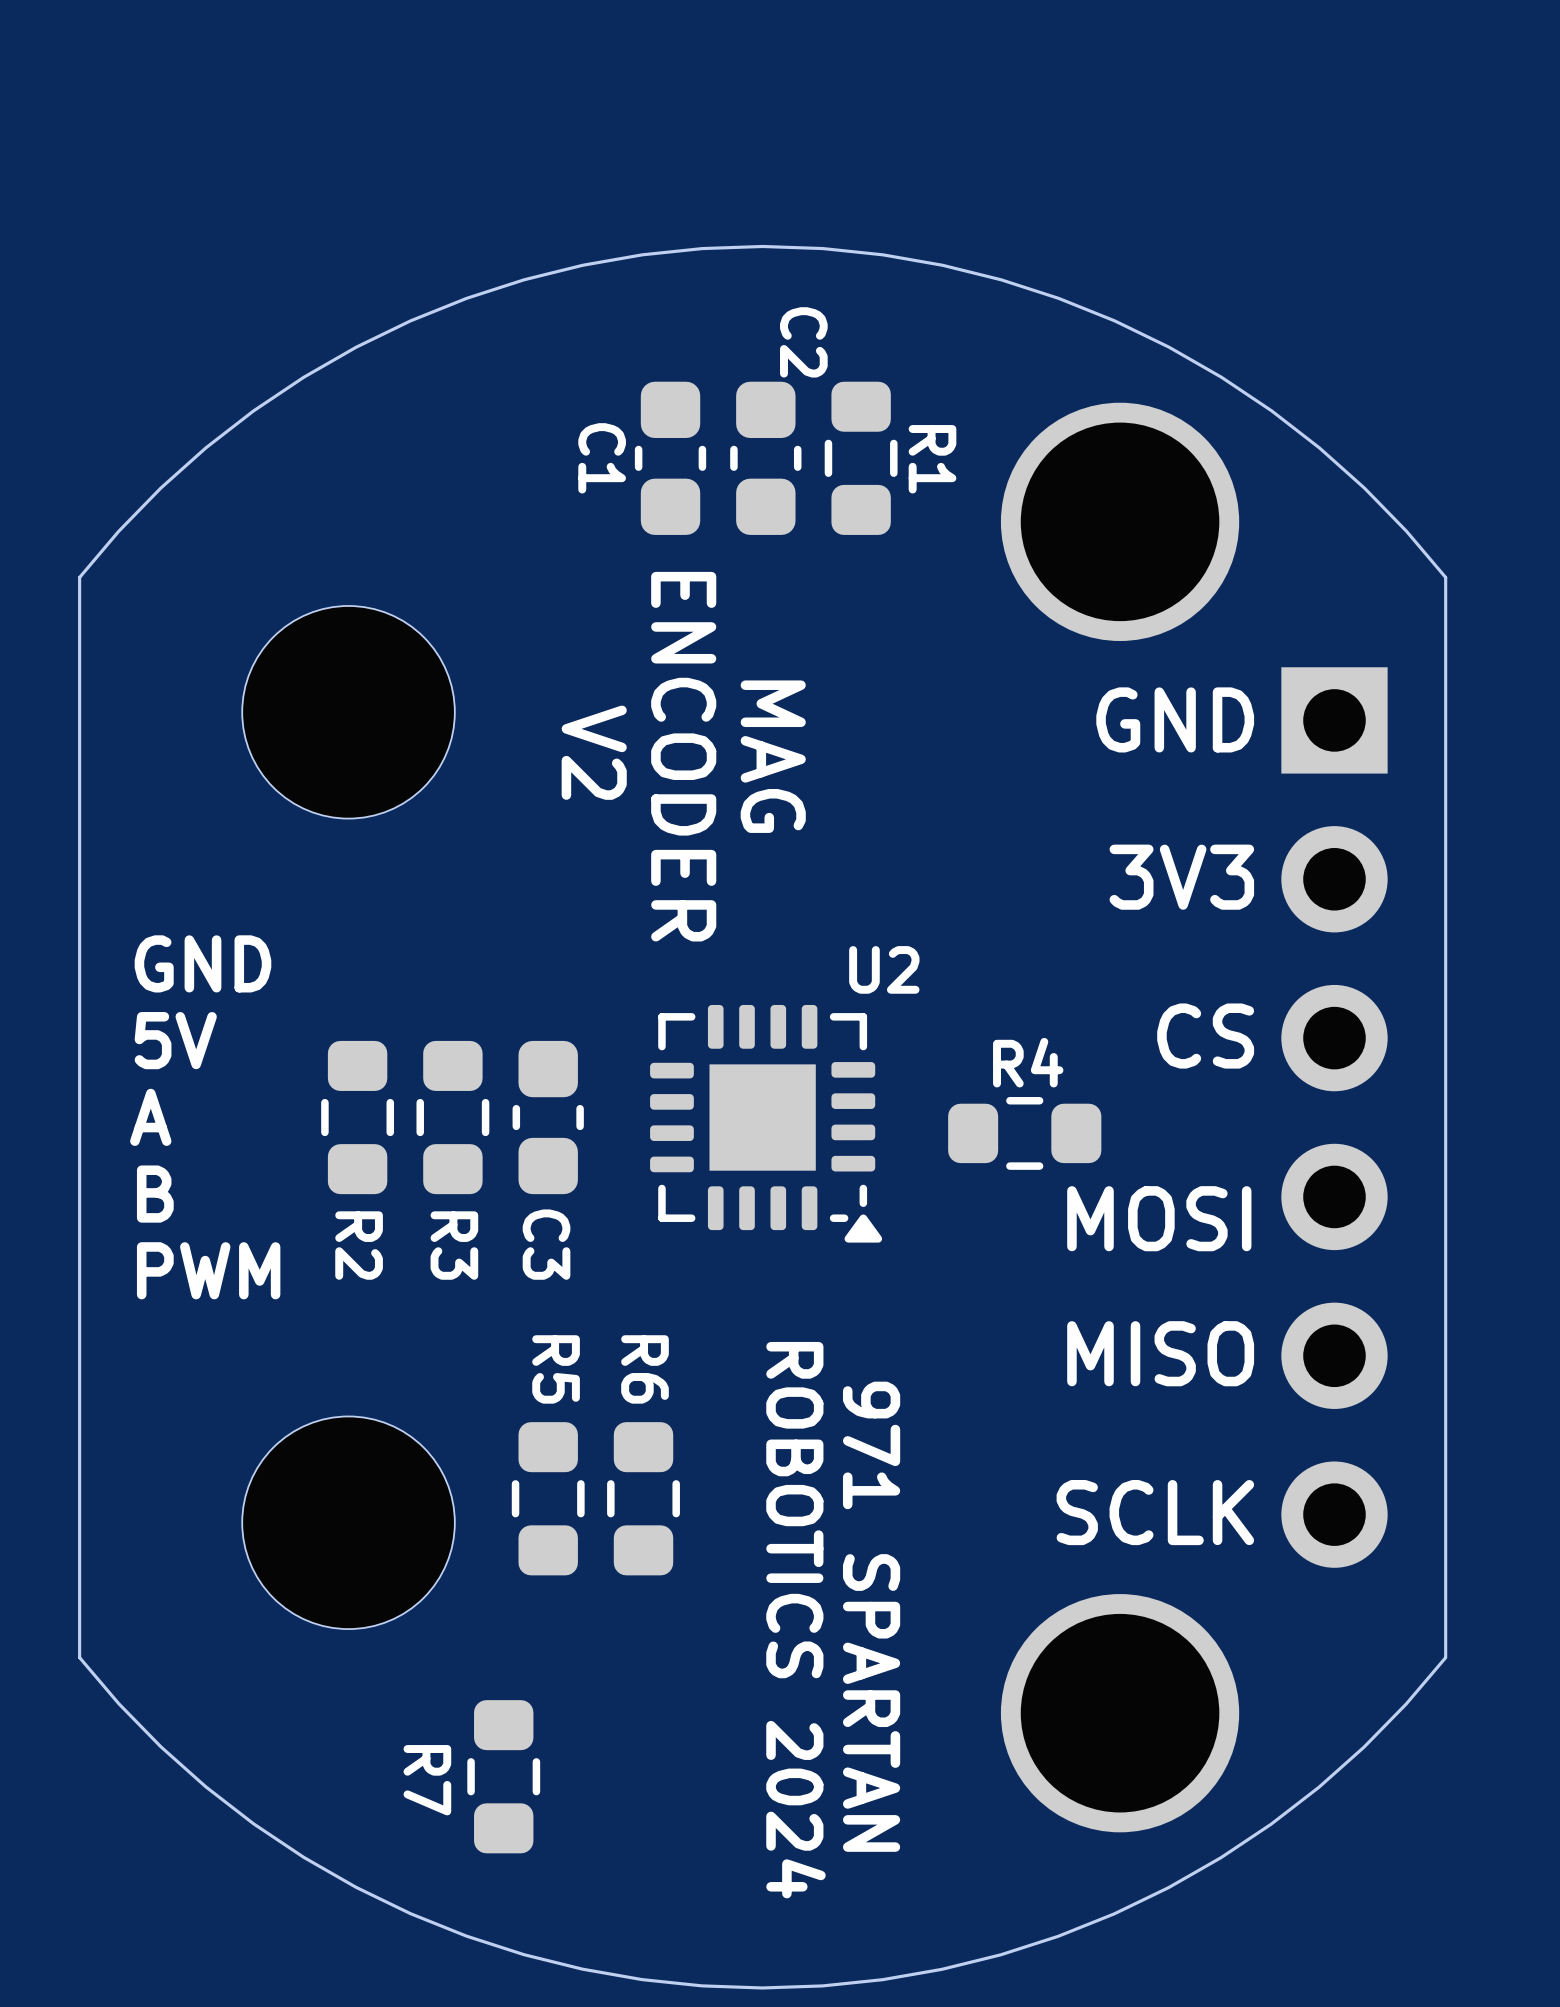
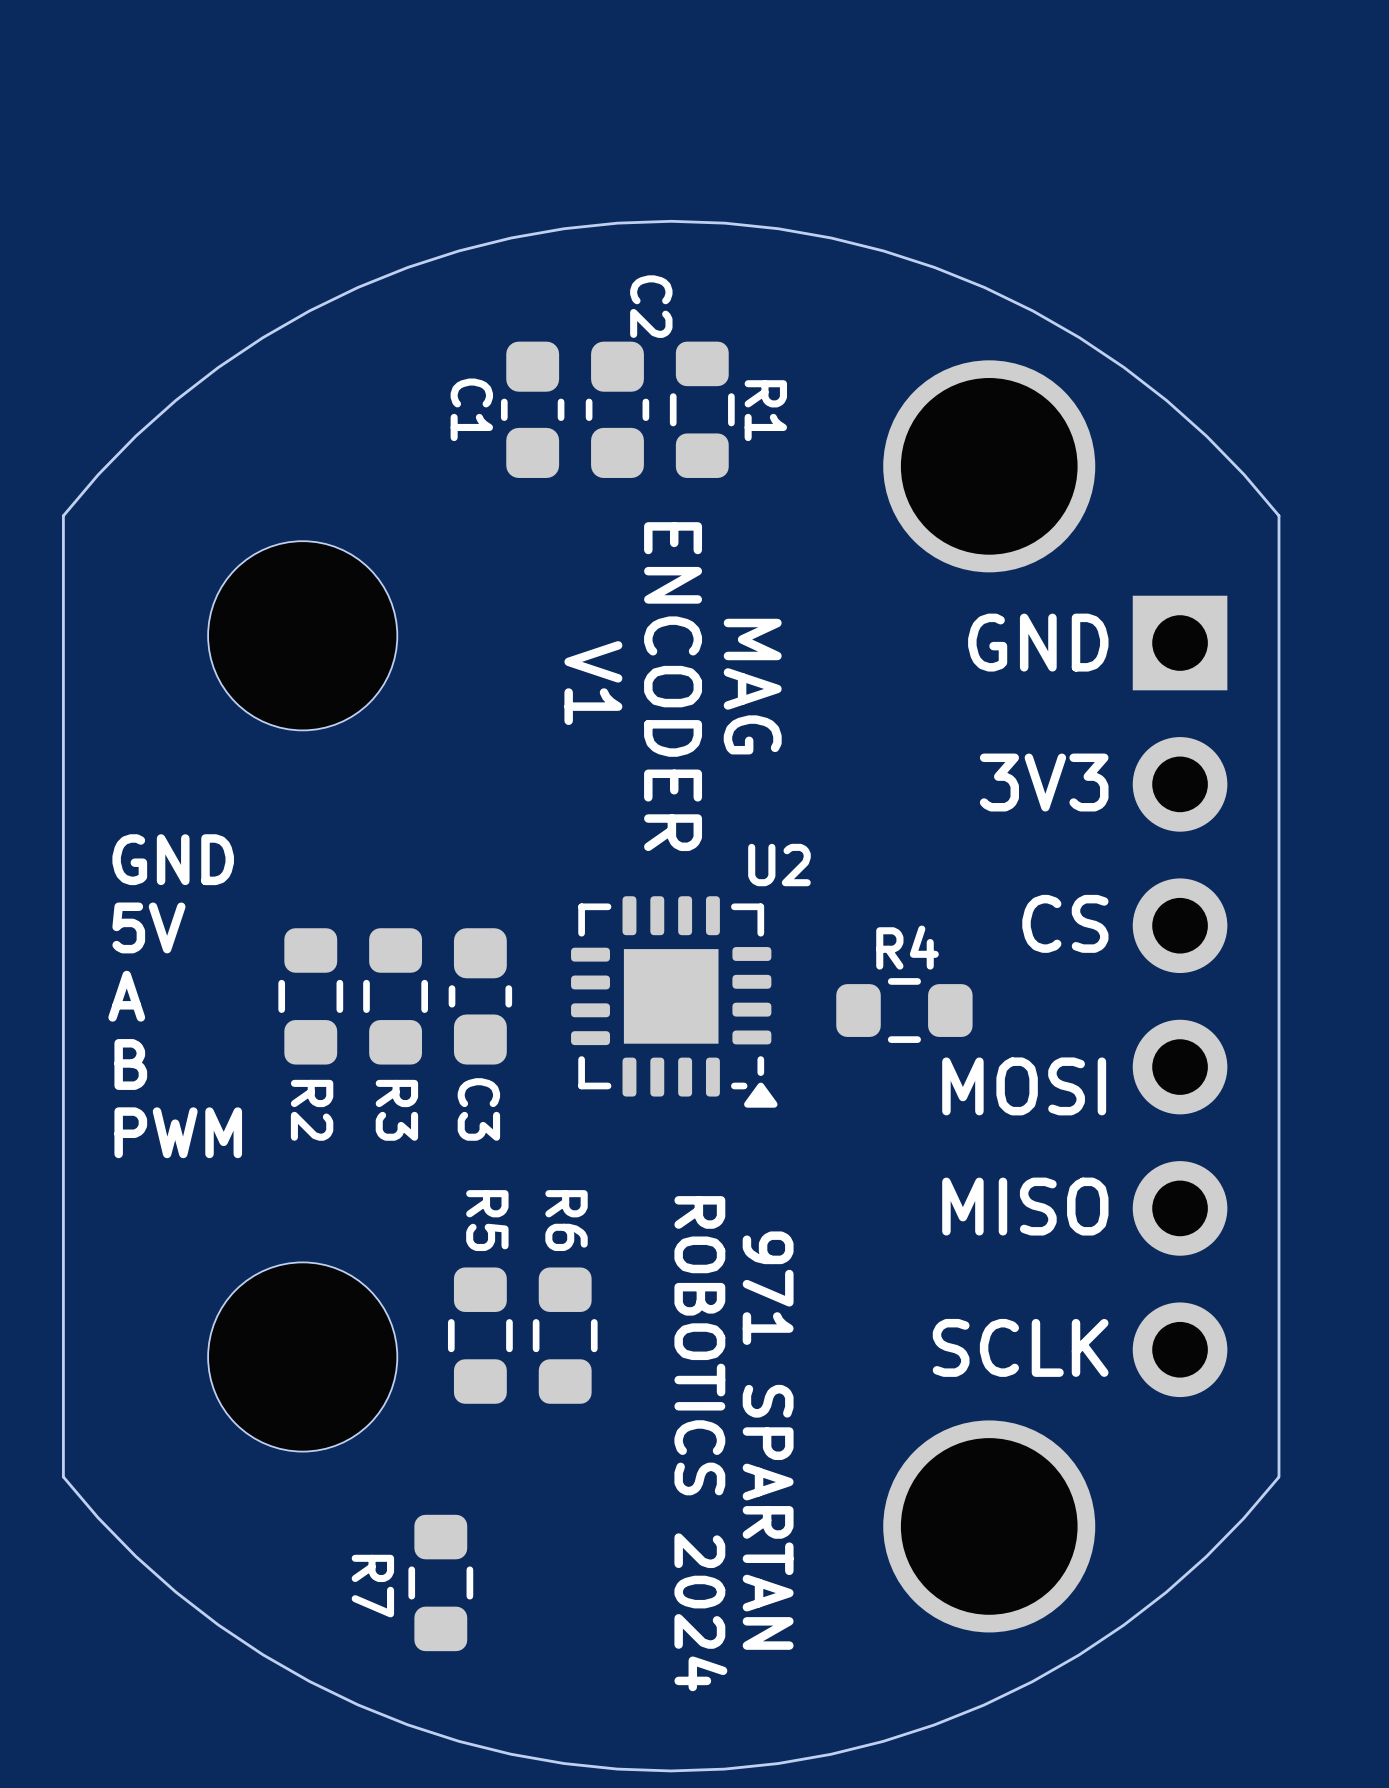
C1 position: (670, 458) -> (532, 409)
C2 position: (765, 458) -> (617, 409)
R1 position: (861, 458) -> (702, 409)
text: V2 (594, 752) -> none
text: ENCODER (683, 756) -> V1 (593, 683)
text: MAG (773, 756) -> ENCODER (673, 686)
text: none -> MAG (752, 686)

